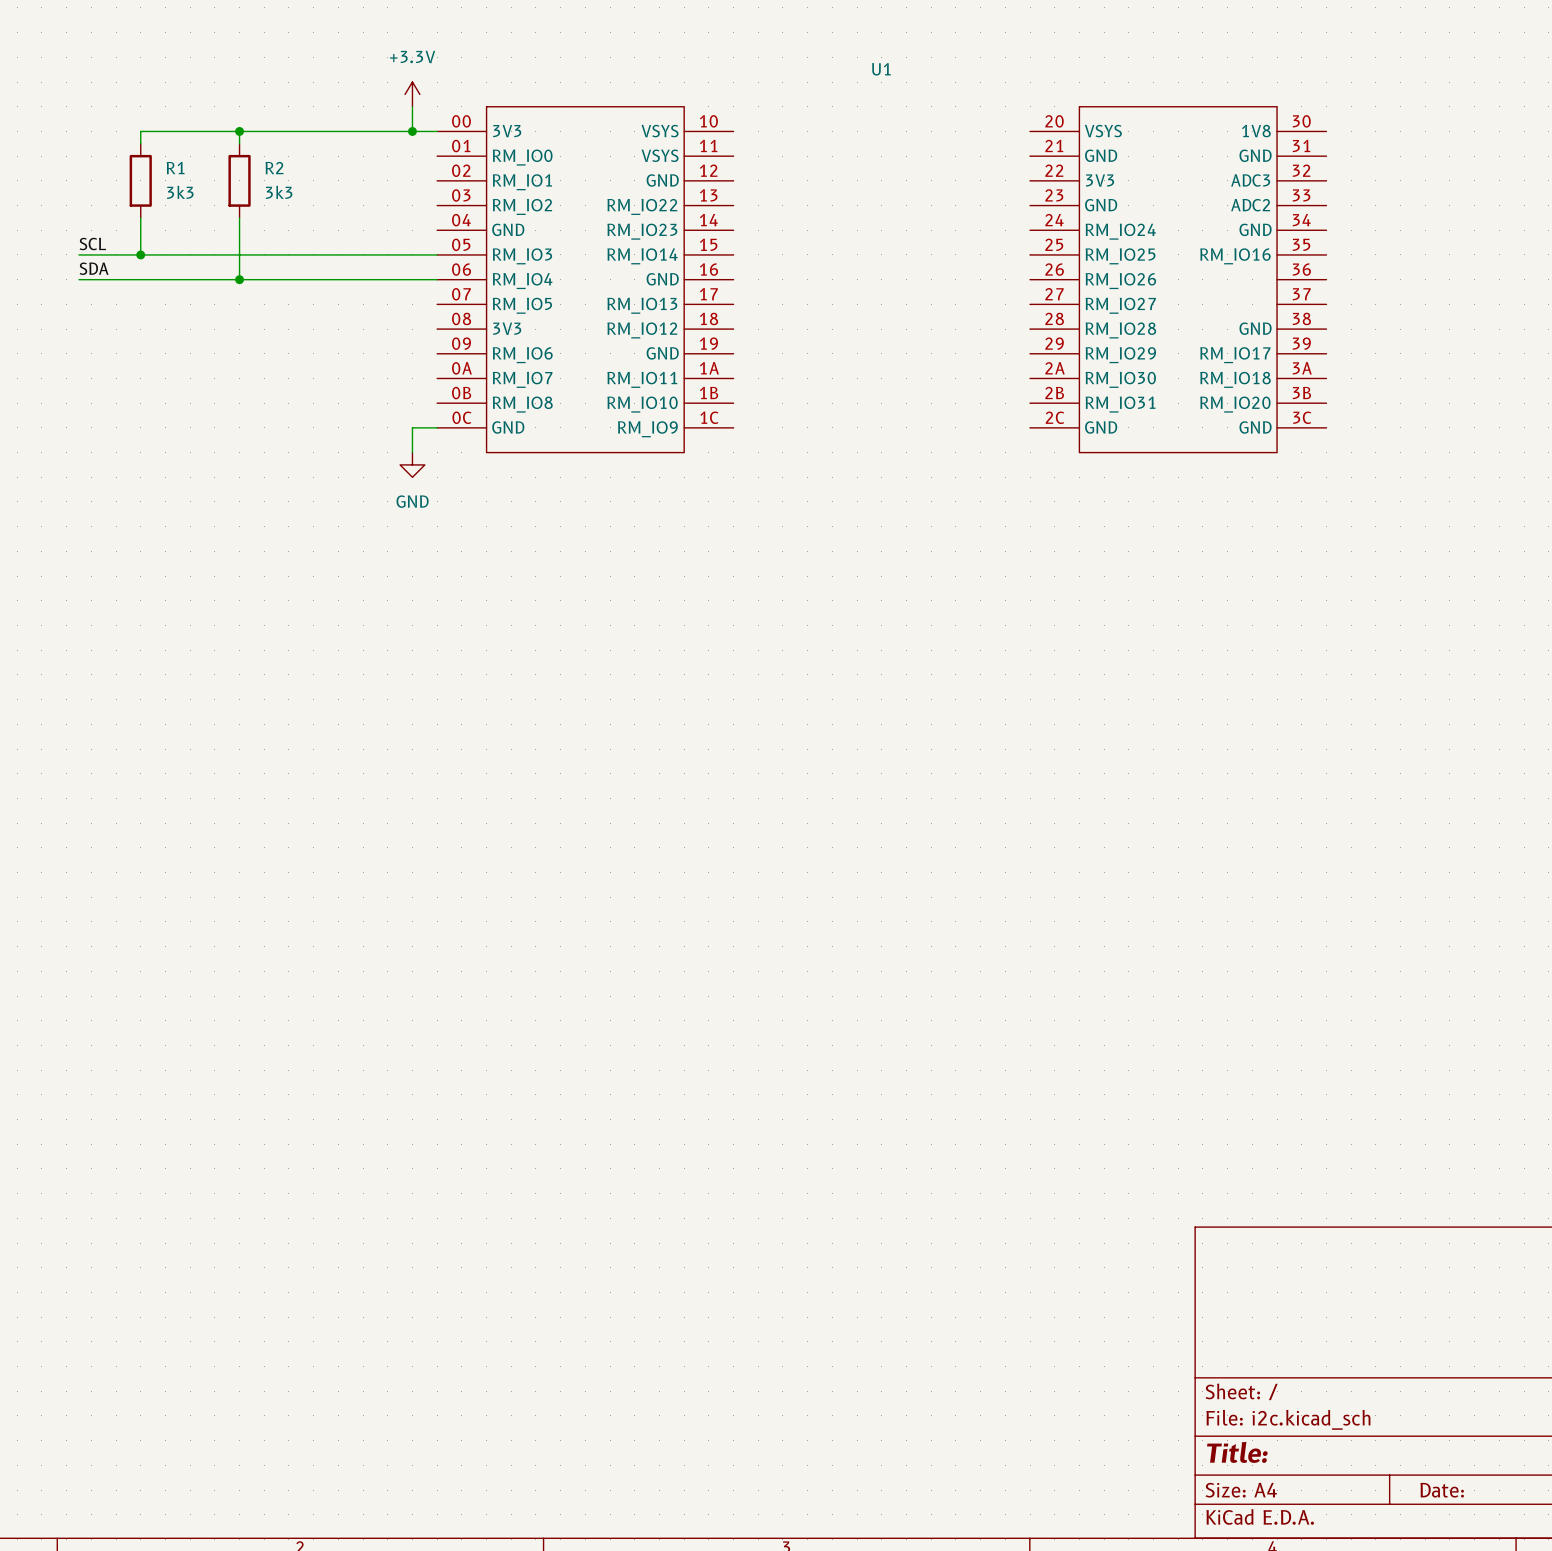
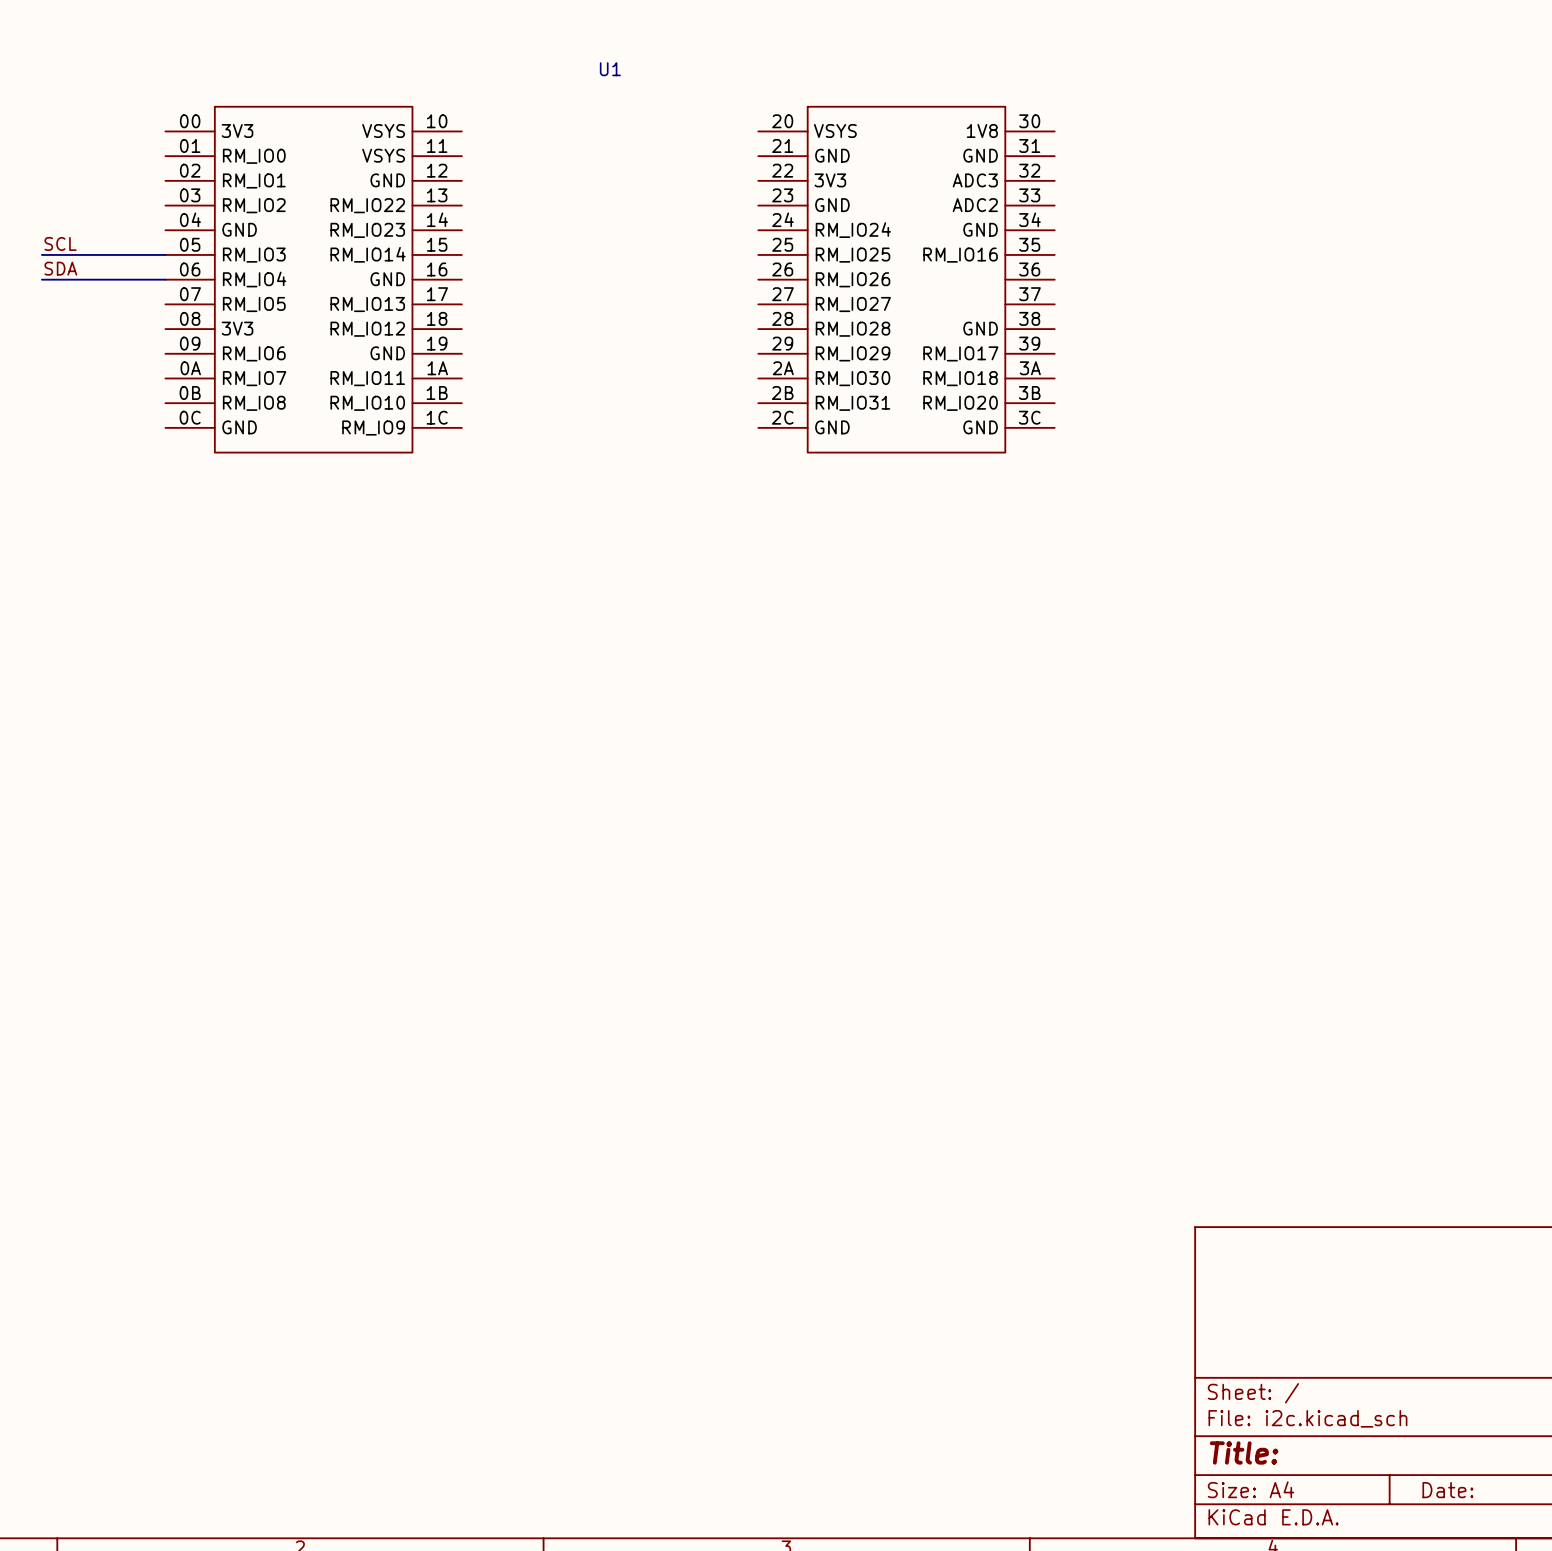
power symbol: +3.3V (412, 94) -> none
wire: (239, 131) (239, 143) -> none
junction: (239, 131) -> none
junction: (412, 131) -> none
wire: (437, 131) (140, 131) (140, 143) -> none
R1: 3k3 (140, 180) -> none
R2: 3k3 (239, 180) -> none
wire: (140, 217) (140, 254) -> none
wire: (239, 217) (239, 279) -> none
label position: SCL (92, 244) -> SCL (60, 243)
wire: none -> (41, 254) (78, 254)
junction: (140, 254) -> none
wire: (165, 254) (437, 254) -> none
label position: SDA (94, 268) -> SDA (60, 268)
wire: none -> (41, 279) (78, 279)
wire: (165, 279) (437, 279) -> none
junction: (239, 279) -> none
U1 position: (881, 279) -> (610, 279)
power symbol: GND (412, 464) -> none

